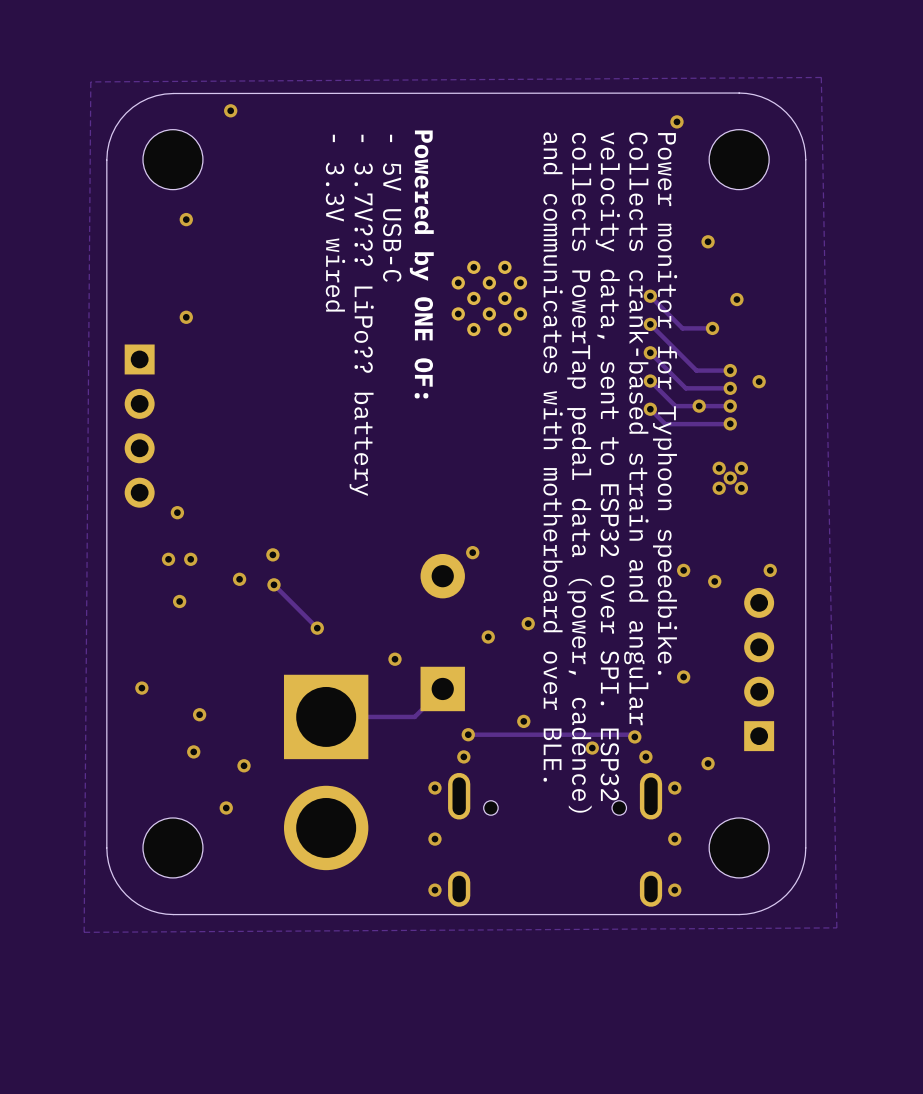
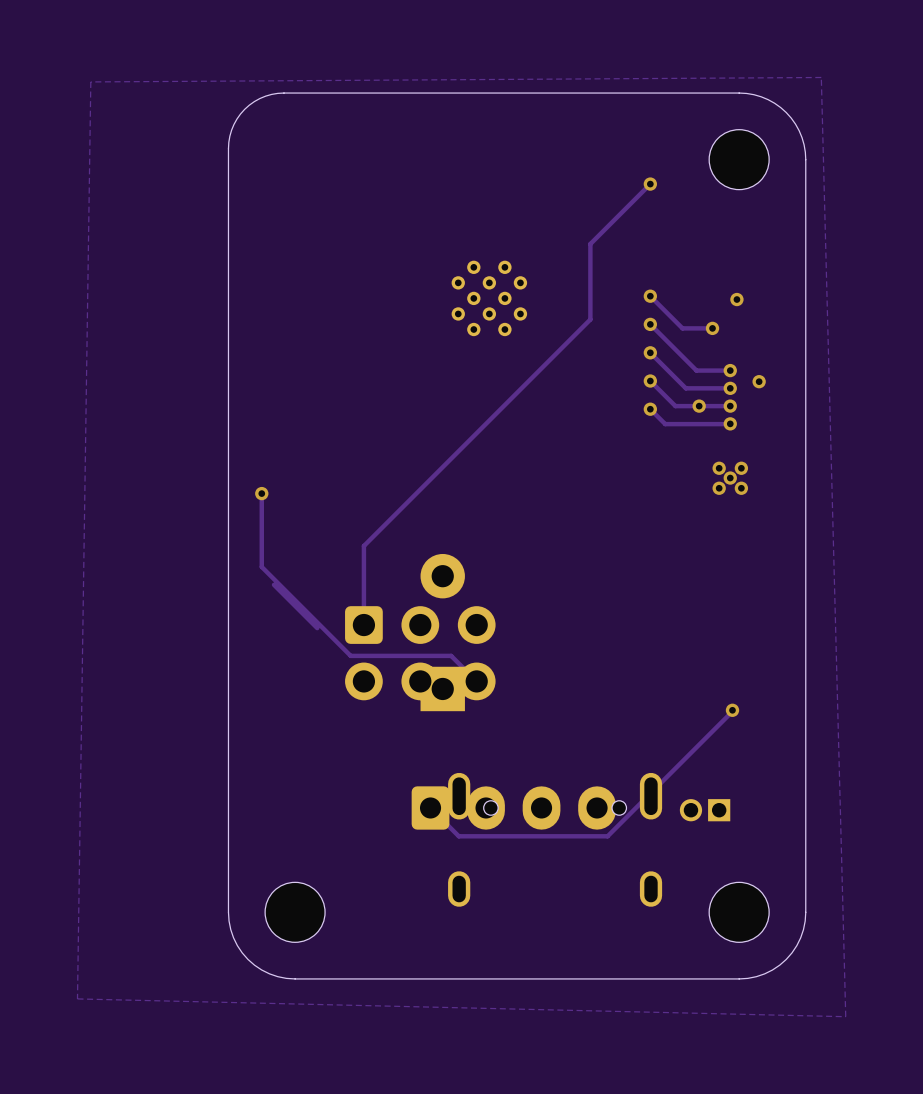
zone outline: (821, 77) (836, 927) (84, 932) (90, 81) -> (821, 77) (845, 1016) (77, 998) (90, 81)
board edge: (739, 93) (173, 93) (147, 98) (132, 107) (120, 119) (109, 142) (106, 160) (107, 855) (113, 876) (126, 895) (144, 907) (165, 914) (739, 914) (753, 912) (768, 907) (786, 895) (795, 883) (802, 869) (805, 847) -> (739, 93) (283, 93) (271, 94) (254, 101) (236, 119) (229, 136) (228, 148) (229, 921) (237, 945) (247, 959) (261, 970) (286, 978) (747, 978) (764, 973) (779, 965) (792, 952) (800, 937) (805, 912) (805, 847)
via: (230, 110) -> none
via: (676, 121) -> none
part: (172, 159) -> none
track: none -> (650, 184) (590, 244) (590, 319) (363, 545) (363, 625)
via: none -> (650, 184)
text: - 5V USB-C (392, 208) -> none
via: (186, 219) -> none
text: - 3.3V wired (335, 223) -> none
via: (708, 241) -> none
text: Powered by ONE OF: (421, 264) -> none
text: - 3.7V??? LiPo?? battery (361, 315) -> none
via: (186, 317) -> none
text: Power monitor for Typhoon speedbike. (665, 403) -> none
part: (139, 426) -> none
text: Collects crank-based strain and angular (636, 428) -> none
text: and communicates with motherboard over BLE. (553, 457) -> none
text: velocity data, sent to ESP32 over SPI. ESP32 (607, 466) -> none
text: collects PowerTap pedal data (power, cadence) (579, 472) -> none
track: none -> (261, 493) (261, 566) (350, 655) (451, 655) (476, 681)
via: none -> (261, 493)
via: (177, 512) -> none
via: (472, 552) -> none
via: (272, 554) -> none
via: (168, 559) -> none
via: (190, 559) -> none
via: (683, 570) -> none
via: (770, 570) -> none
via: (239, 579) -> none
via: (714, 581) -> none
via: (273, 584) -> none
via: (179, 601) -> none
via: (528, 623) -> none
via: (317, 628) -> none
via: (488, 637) -> none
part: none -> (420, 653)
via: (395, 659) -> none
part: (759, 669) -> none
via: (683, 676) -> none
via: (141, 688) -> none
track: (442, 688) (414, 716) (326, 716) -> none
track: none -> (732, 710) (607, 836) (458, 836) (430, 807)
via: none -> (732, 710)
via: (199, 714) -> none
via: (523, 721) -> none
track: (468, 734) (632, 734) (634, 736) -> none
via: (468, 734) -> none
via: (634, 736) -> none
via: (592, 748) -> none
via: (193, 751) -> none
via: (463, 756) -> none
via: (645, 756) -> none
via: (708, 763) -> none
via: (244, 765) -> none
part: (326, 772) -> none
via: (434, 788) -> none
via: (674, 788) -> none
via: (226, 807) -> none
part: none -> (513, 807)
part: none -> (705, 810)
via: (434, 839) -> none
via: (674, 839) -> none
part position: (172, 847) -> (295, 912)
part position: (739, 847) -> (739, 912)
via: (434, 890) -> none
via: (674, 890) -> none

